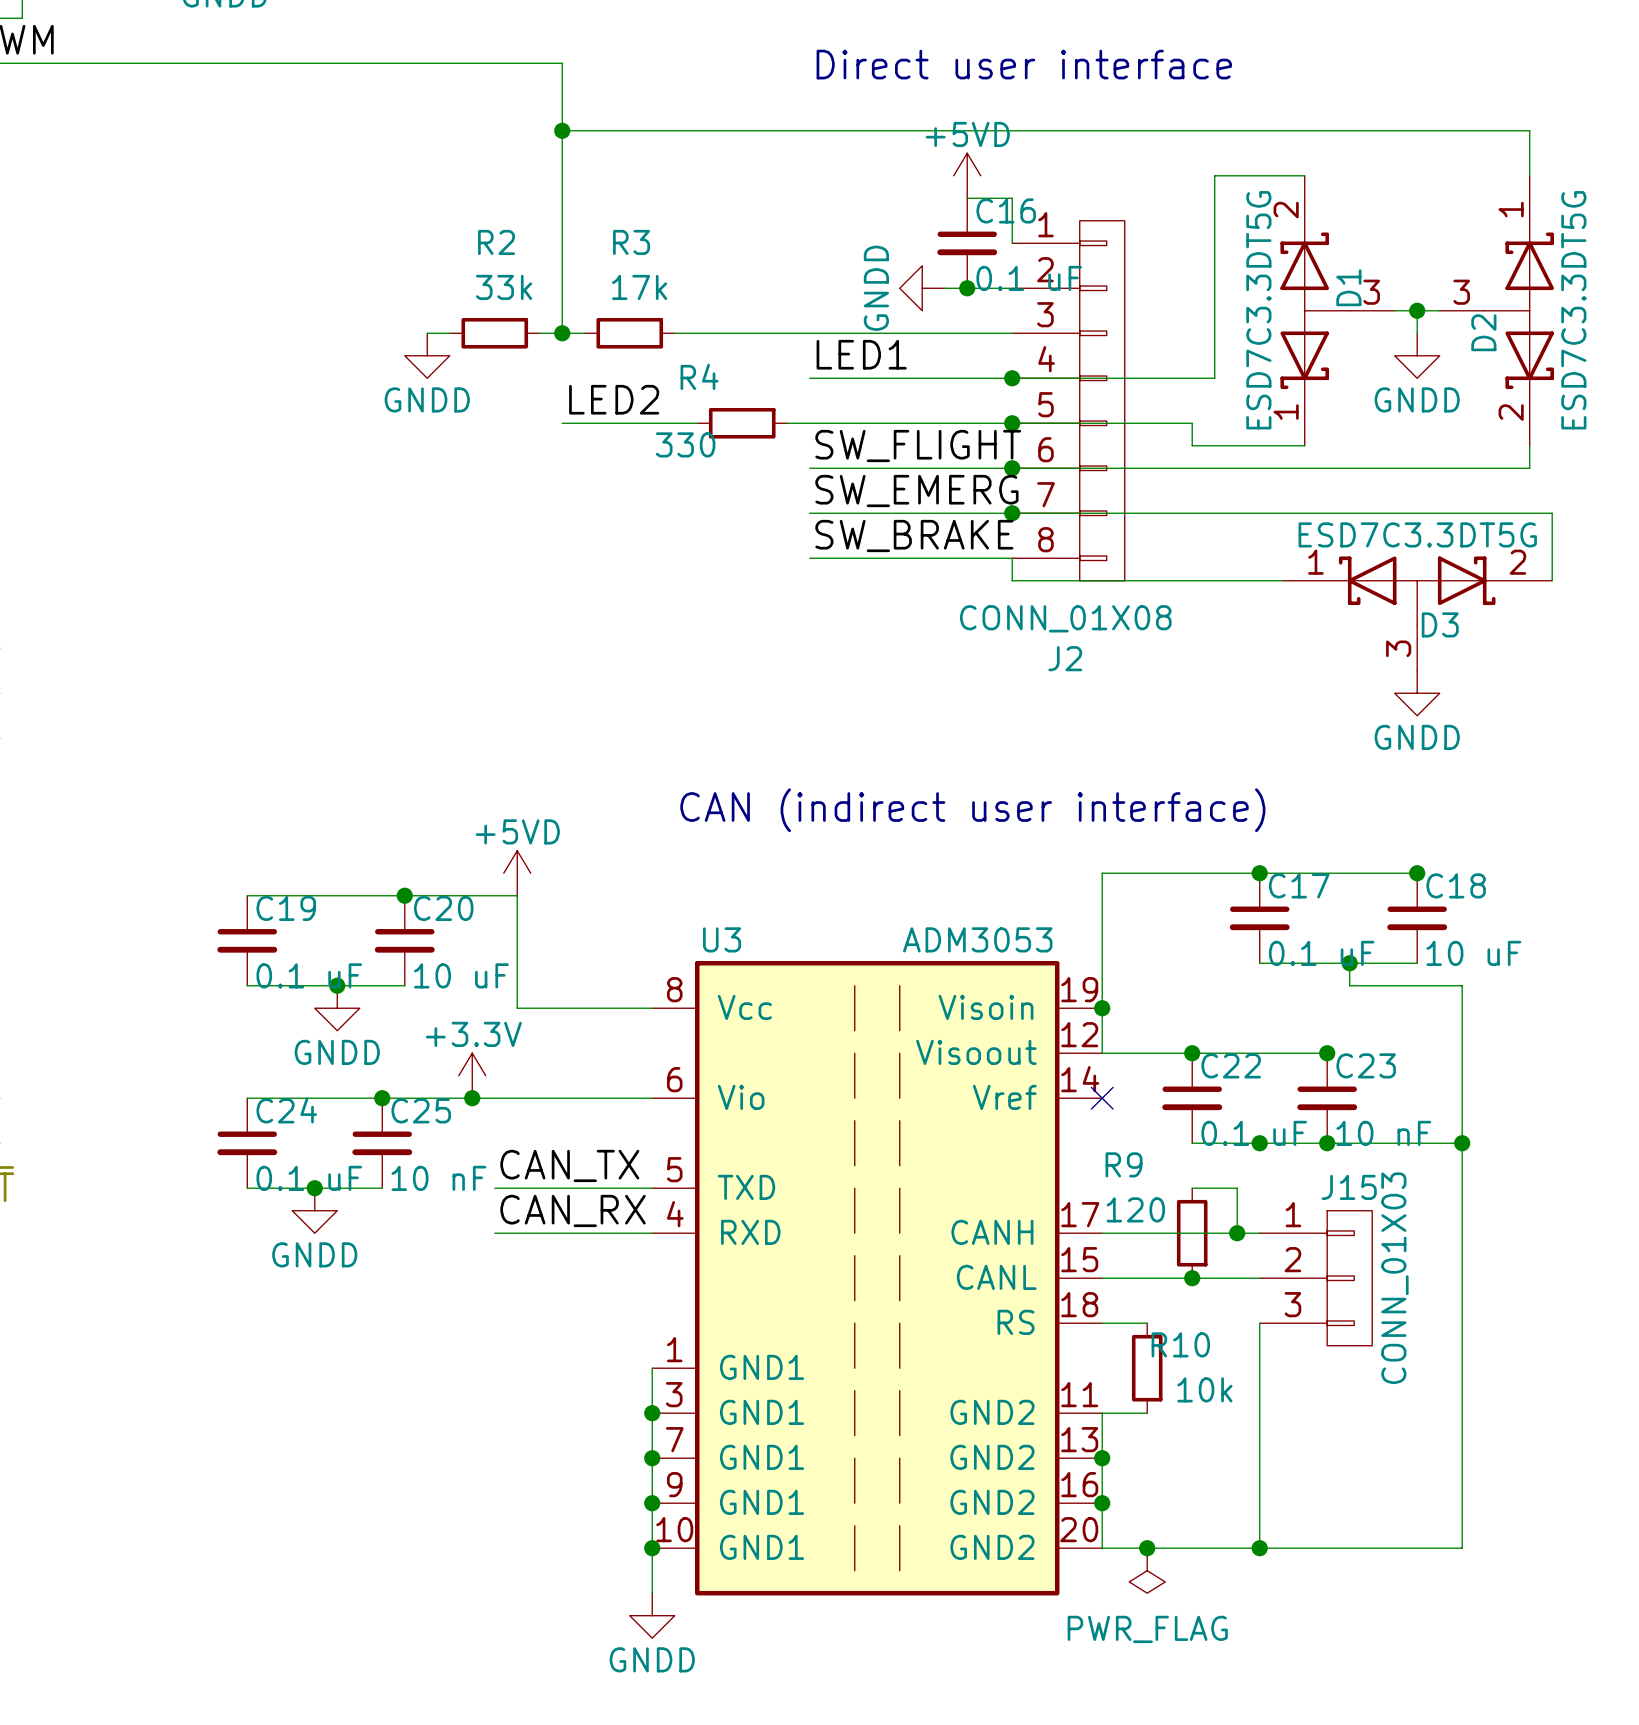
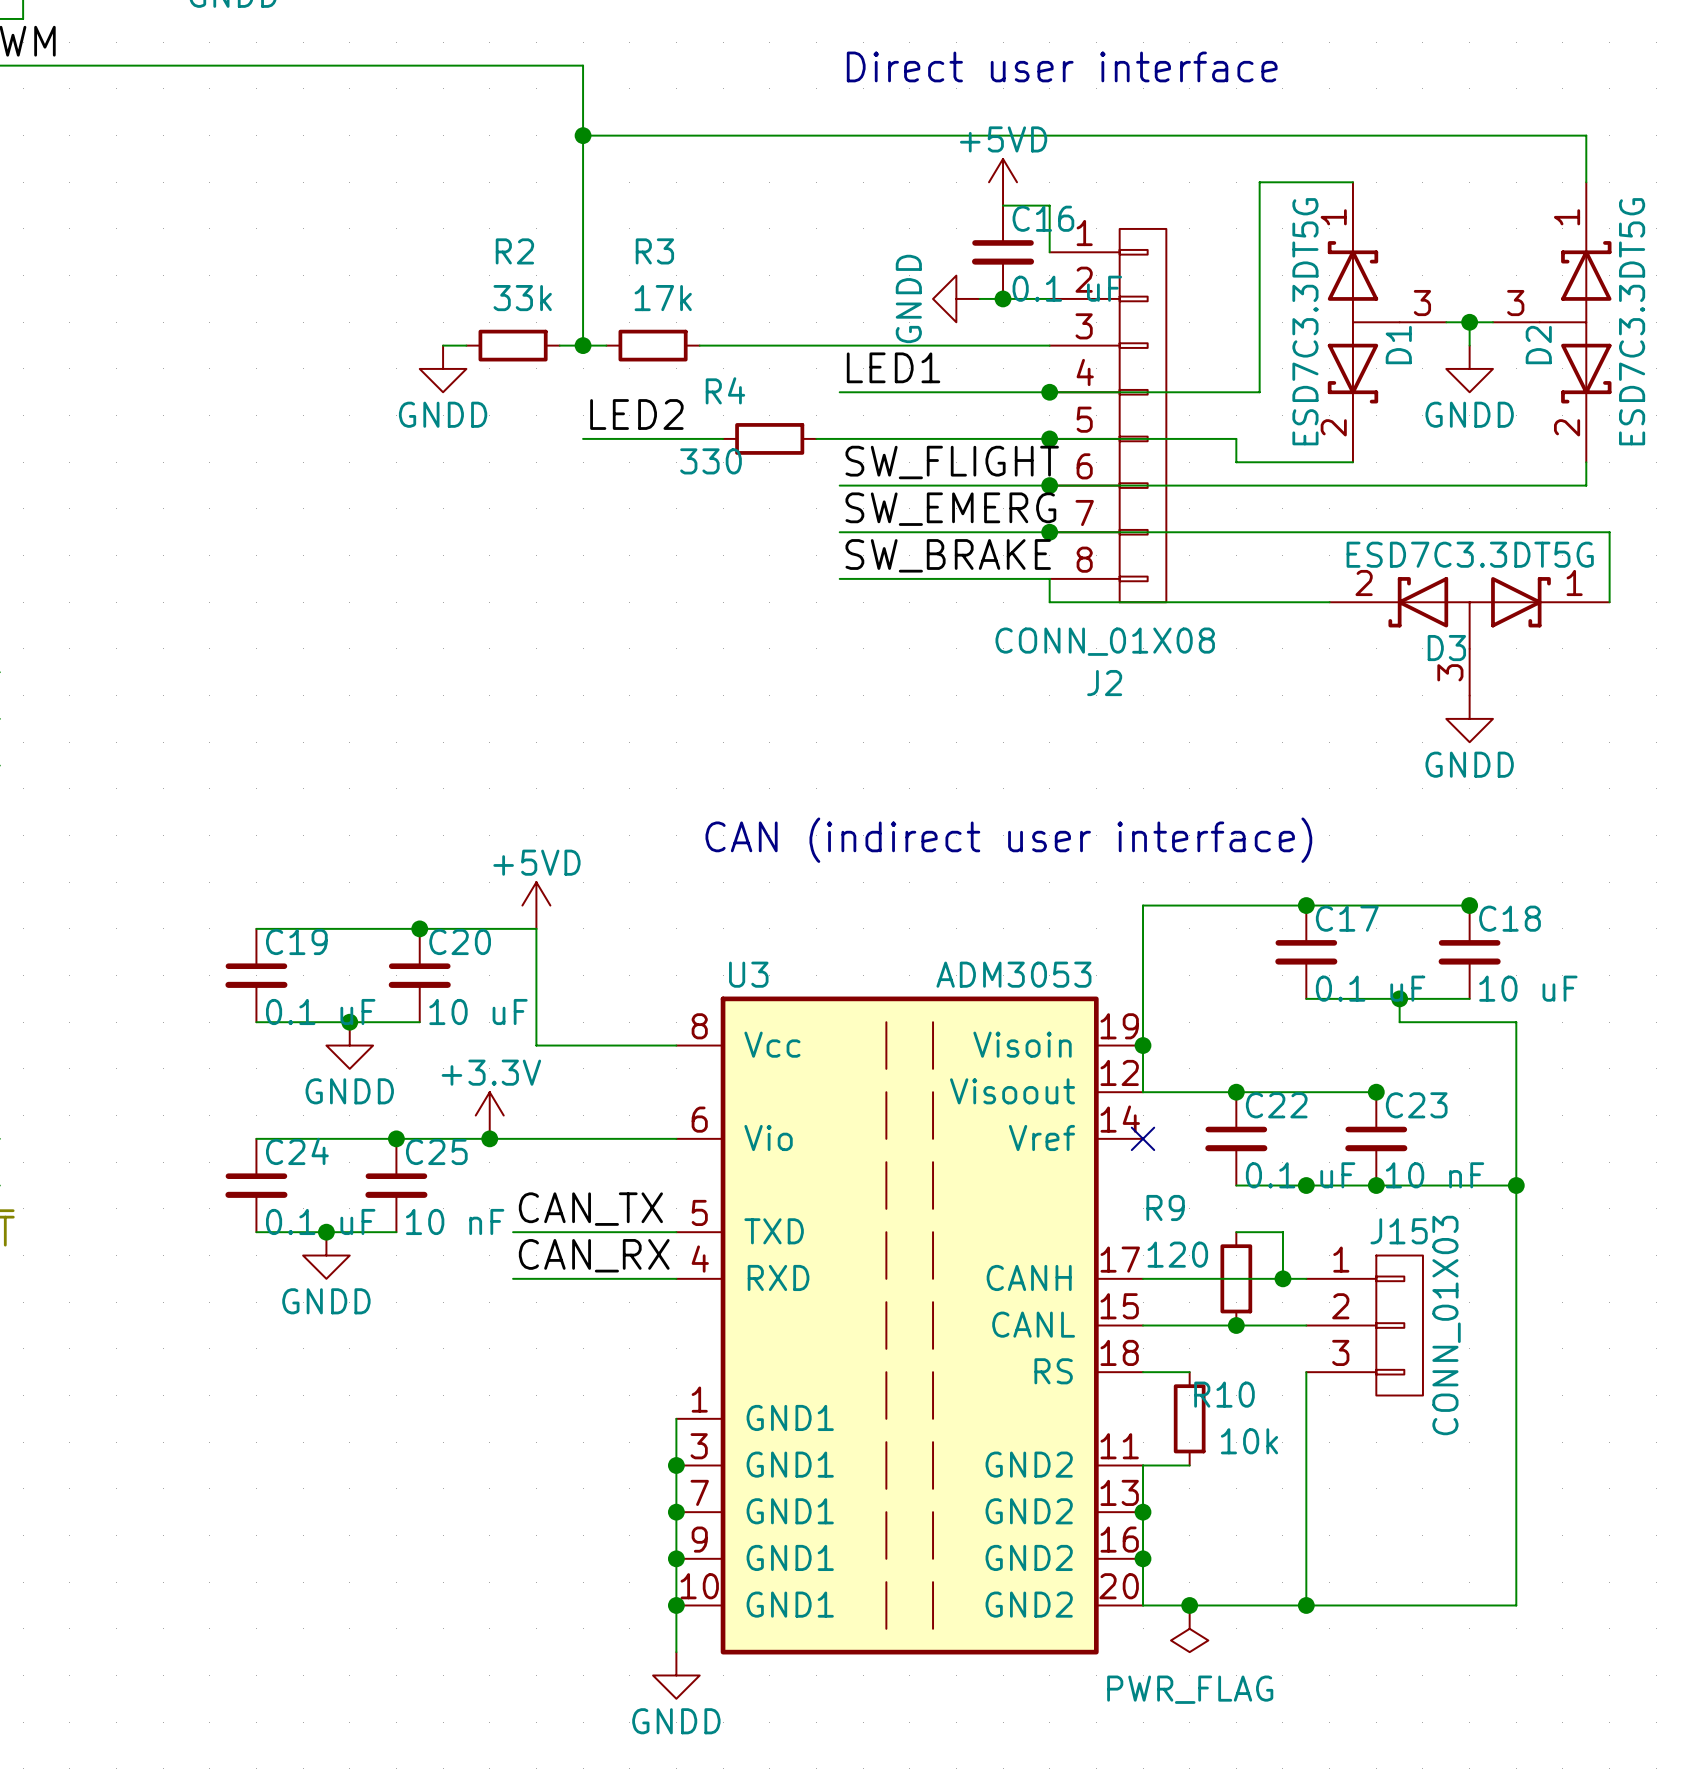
D1 flip: as is (1315, 310) -> up-down (1363, 322)
D3 flip: as is (1417, 591) -> left-right (1469, 612)

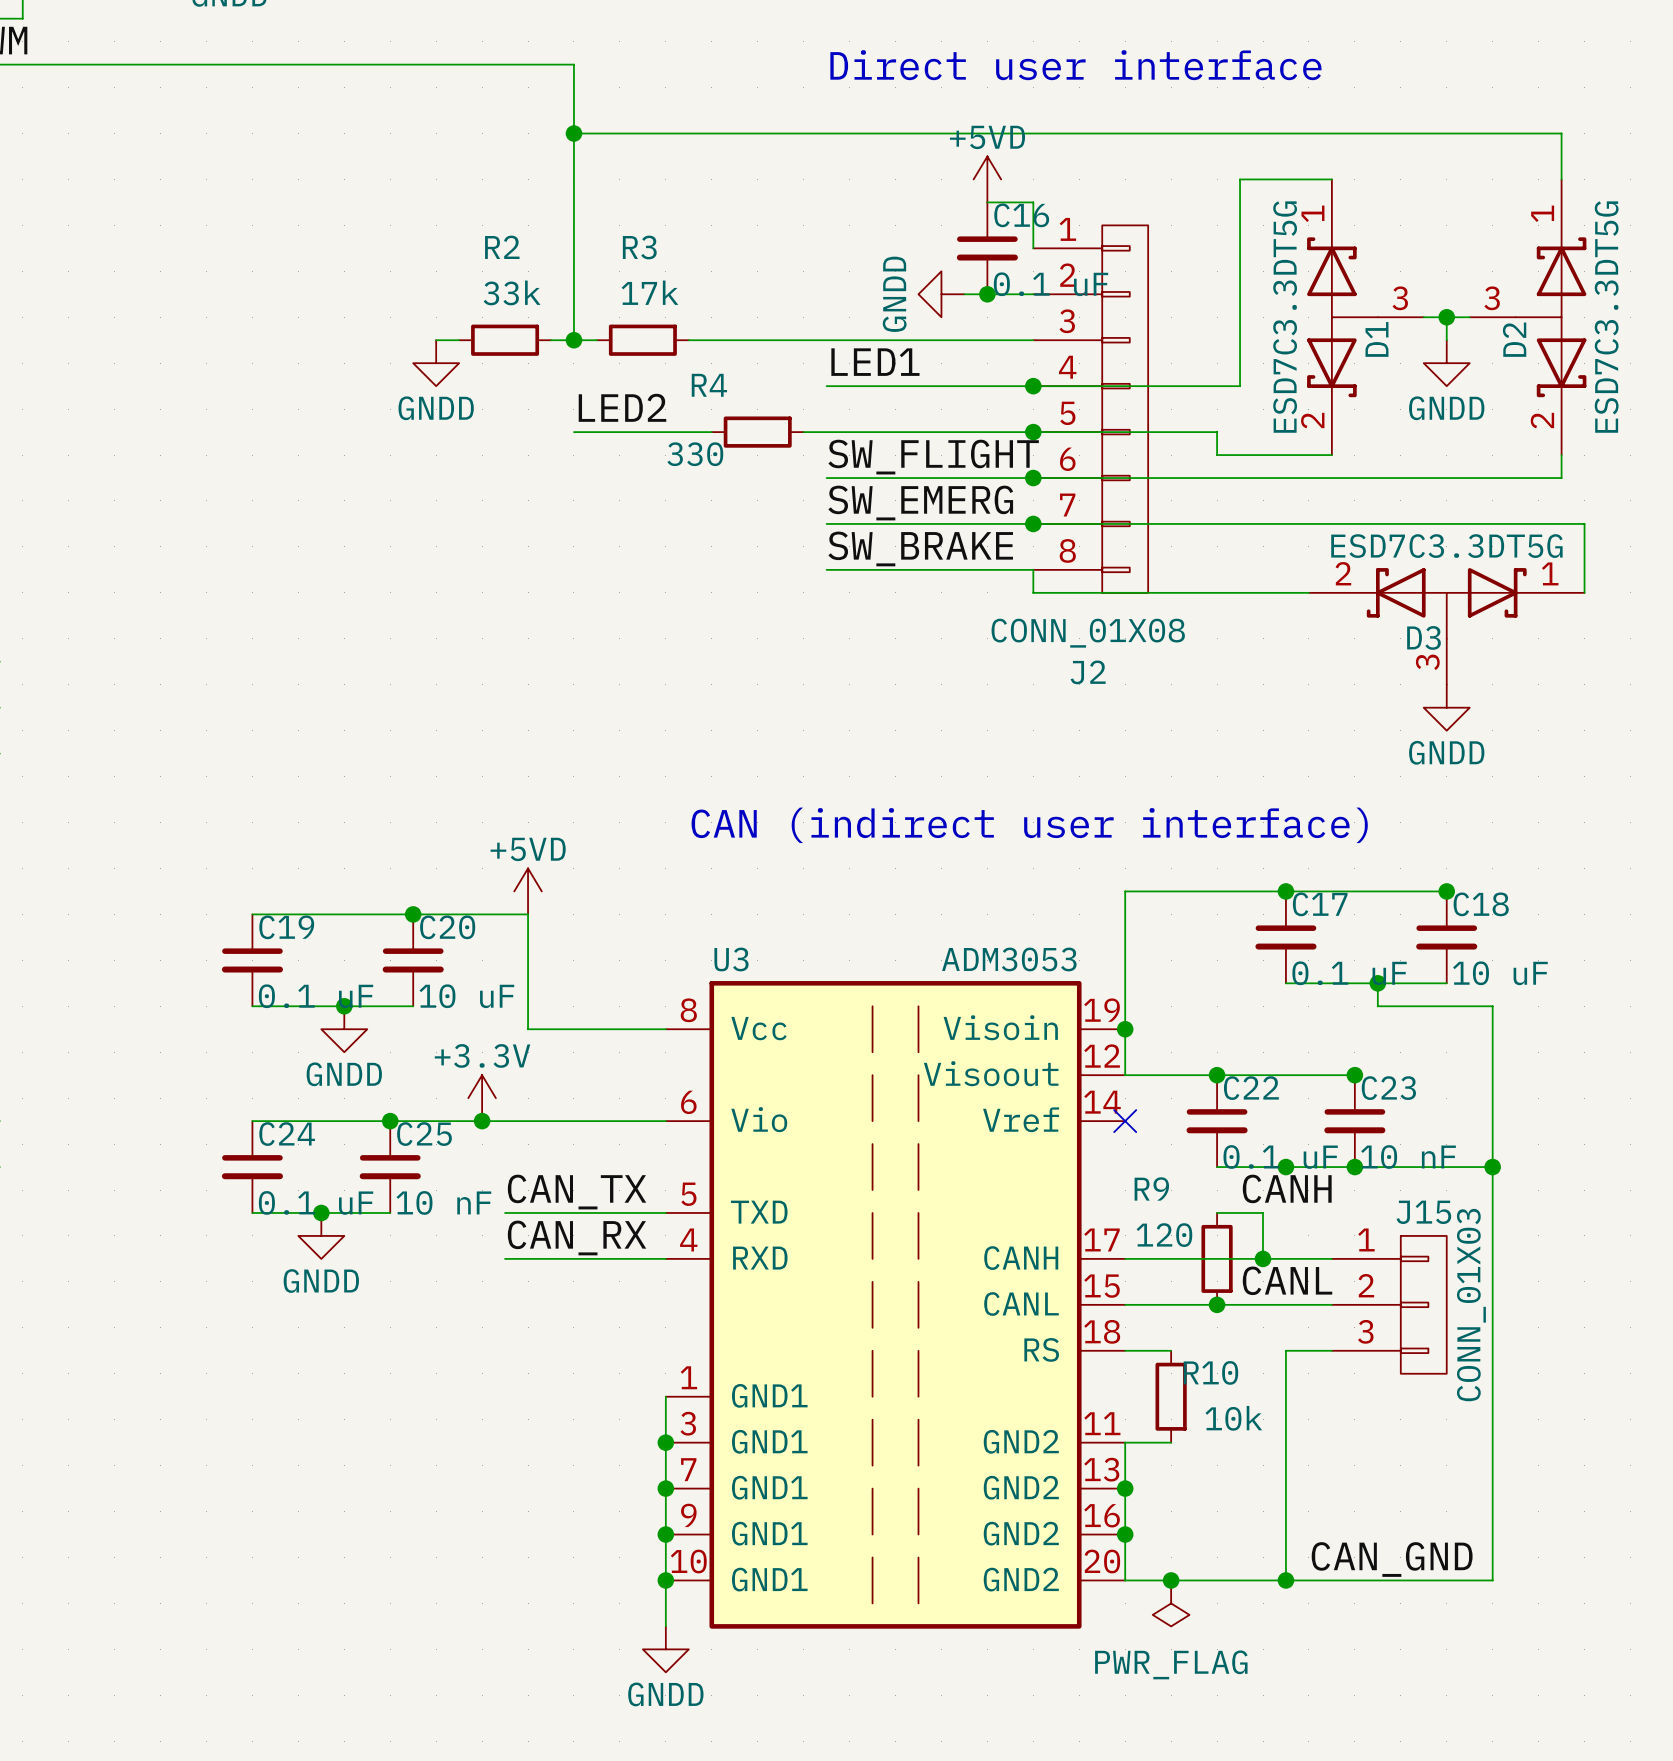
label: none -> CANH (1287, 1188)
label: none -> CANL (1287, 1280)
J15 position: (1364, 1325) -> (1389, 1304)
label: none -> CAN_GND (1392, 1559)

